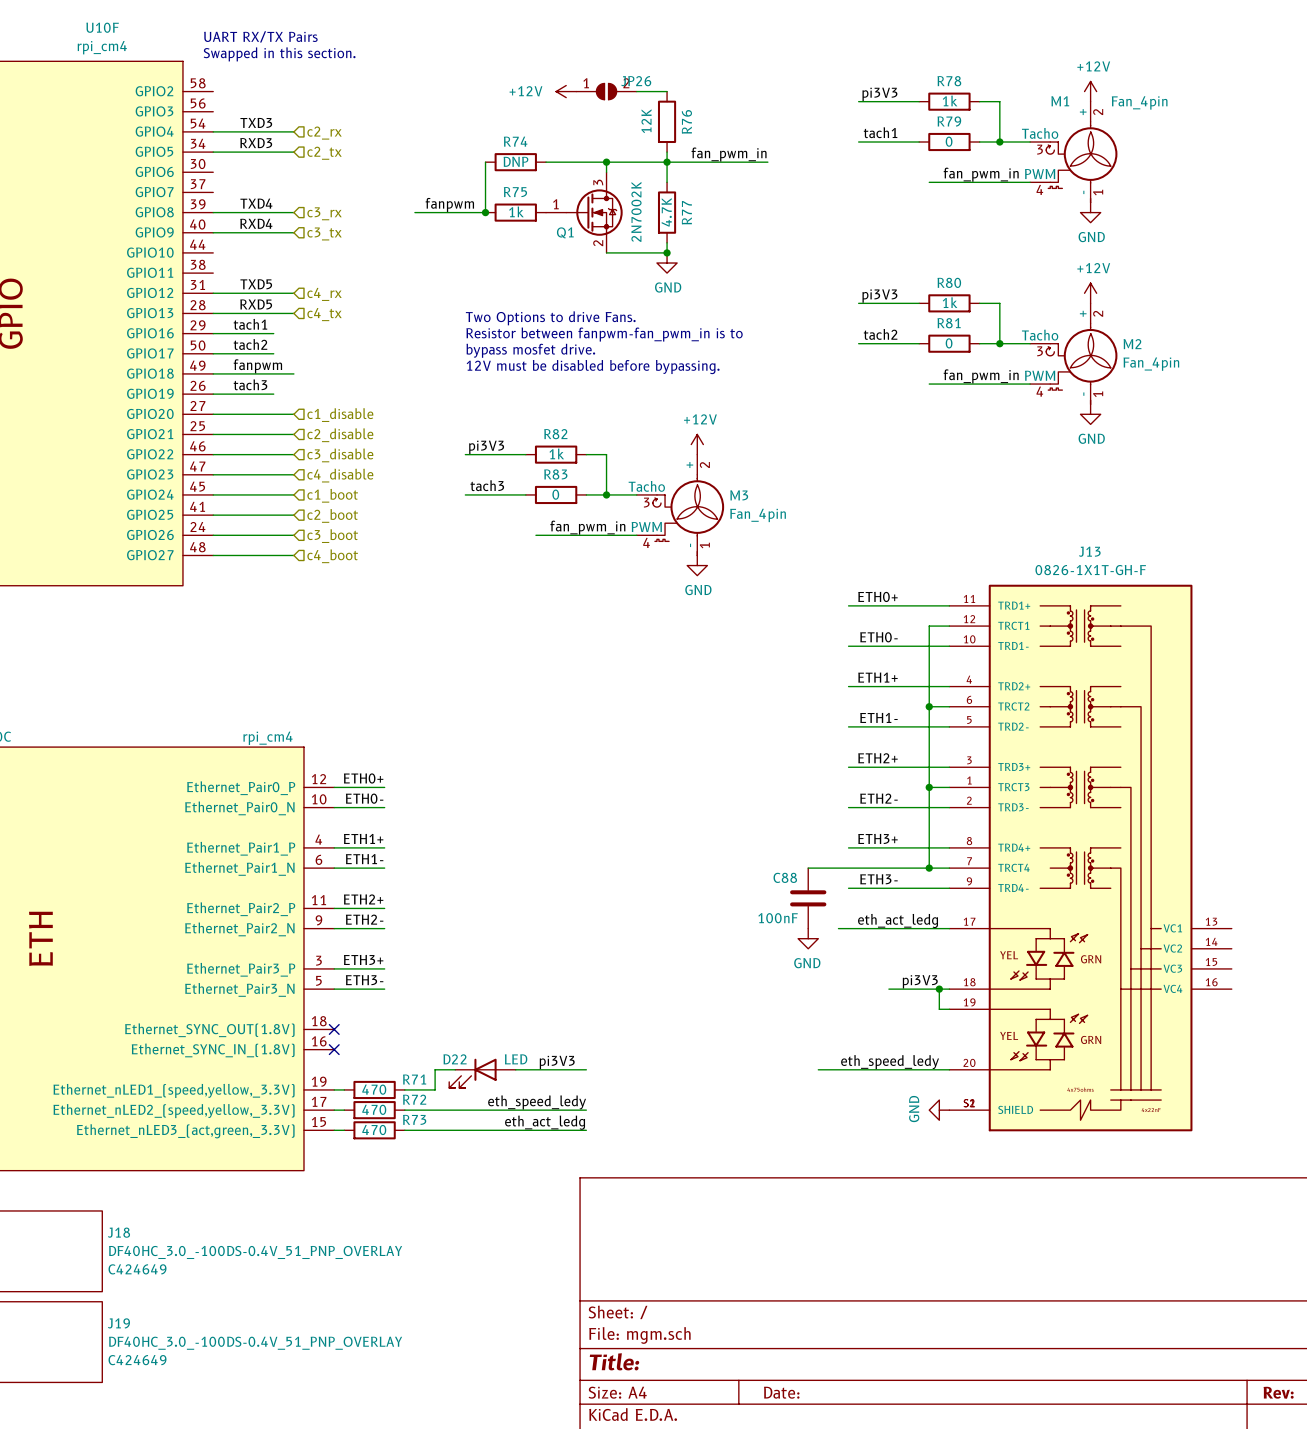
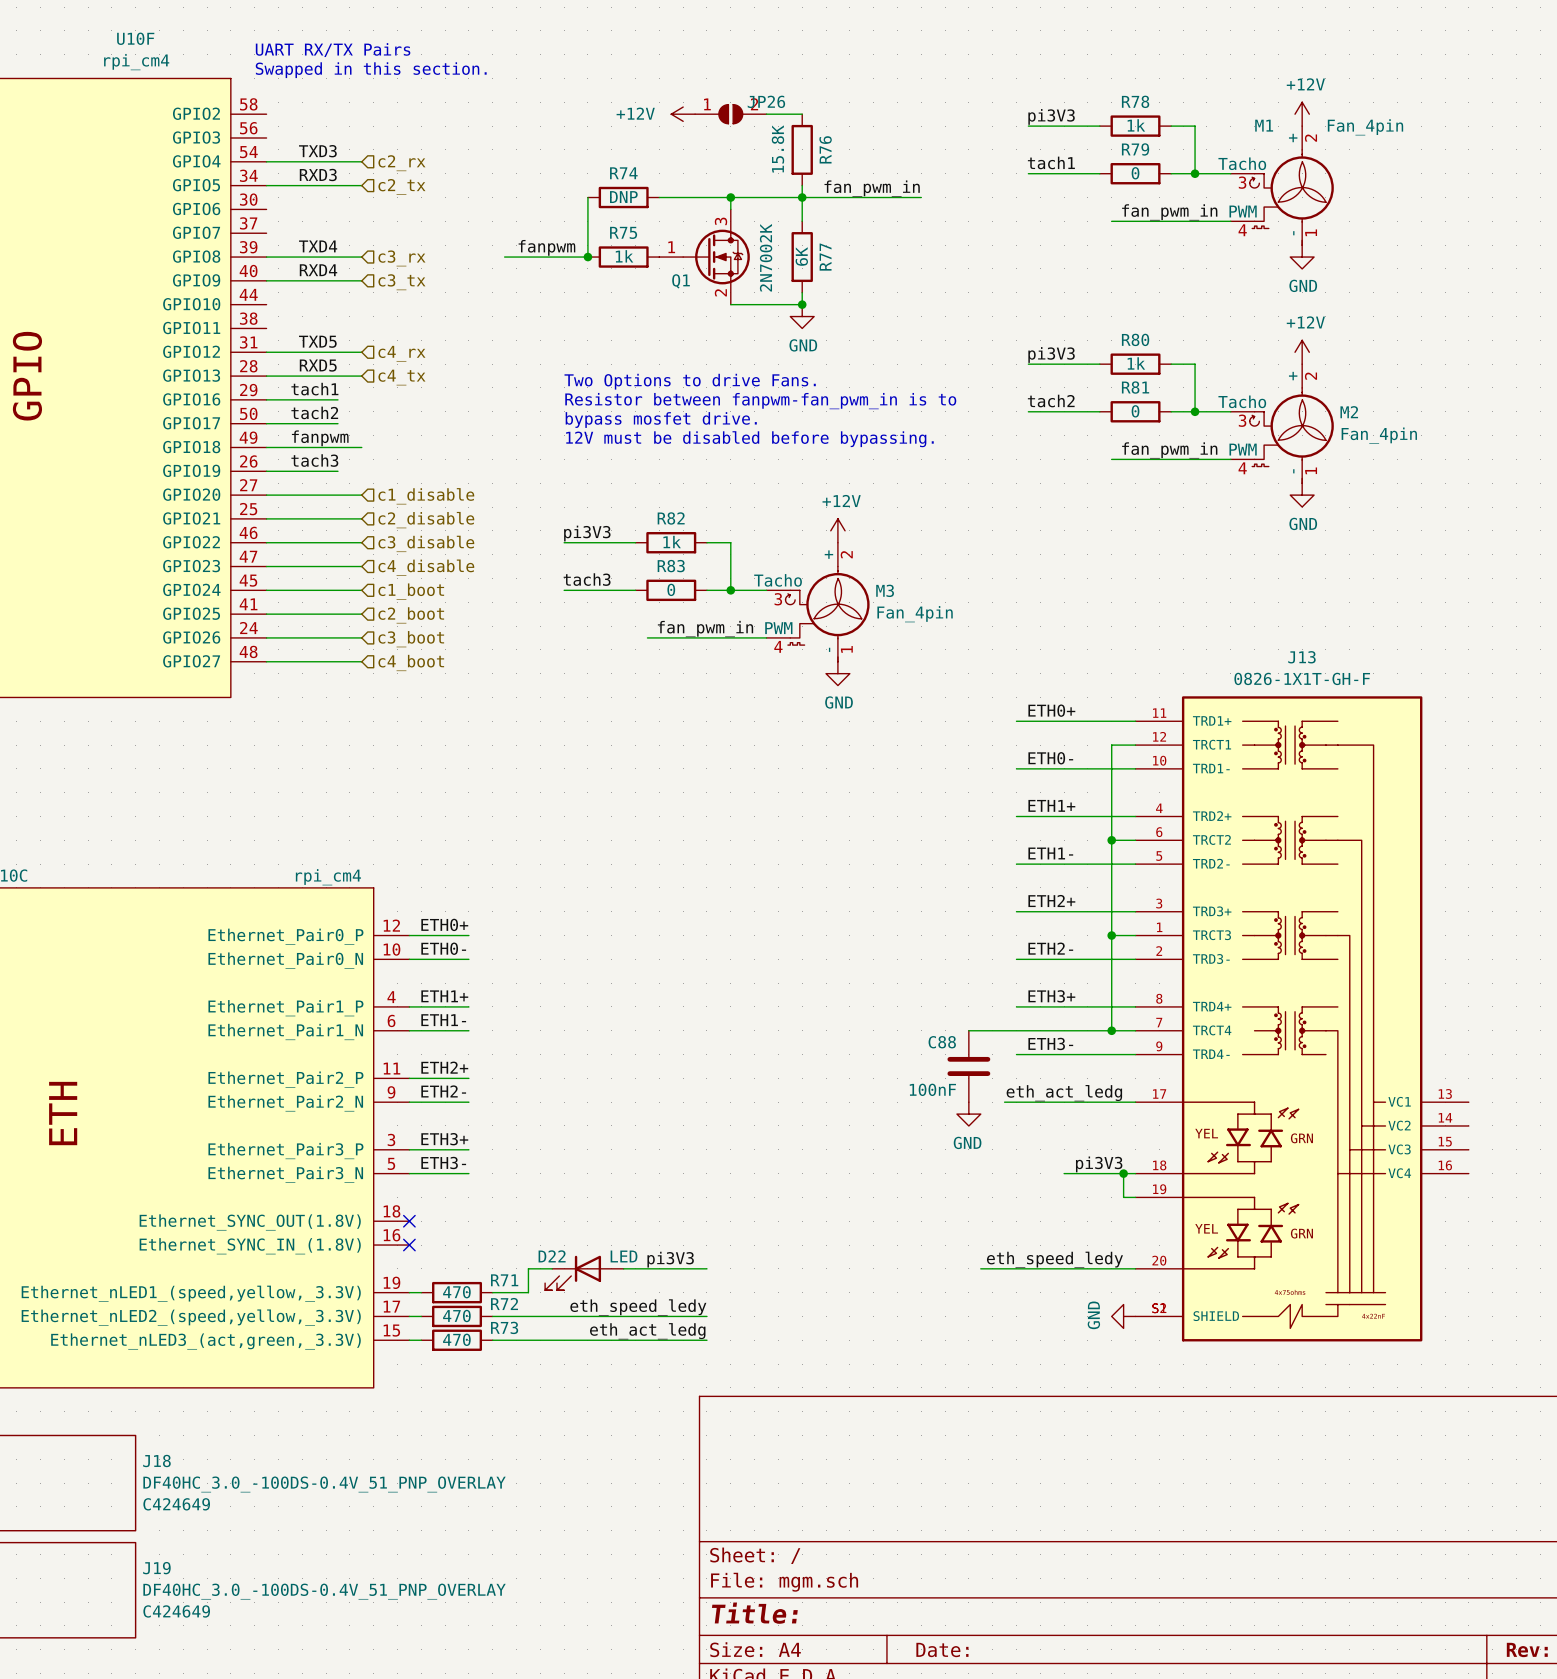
R76 value: 12K (646, 121) -> 15.8K (777, 148)
R77 value: 4.7K (666, 212) -> 6K (801, 256)

